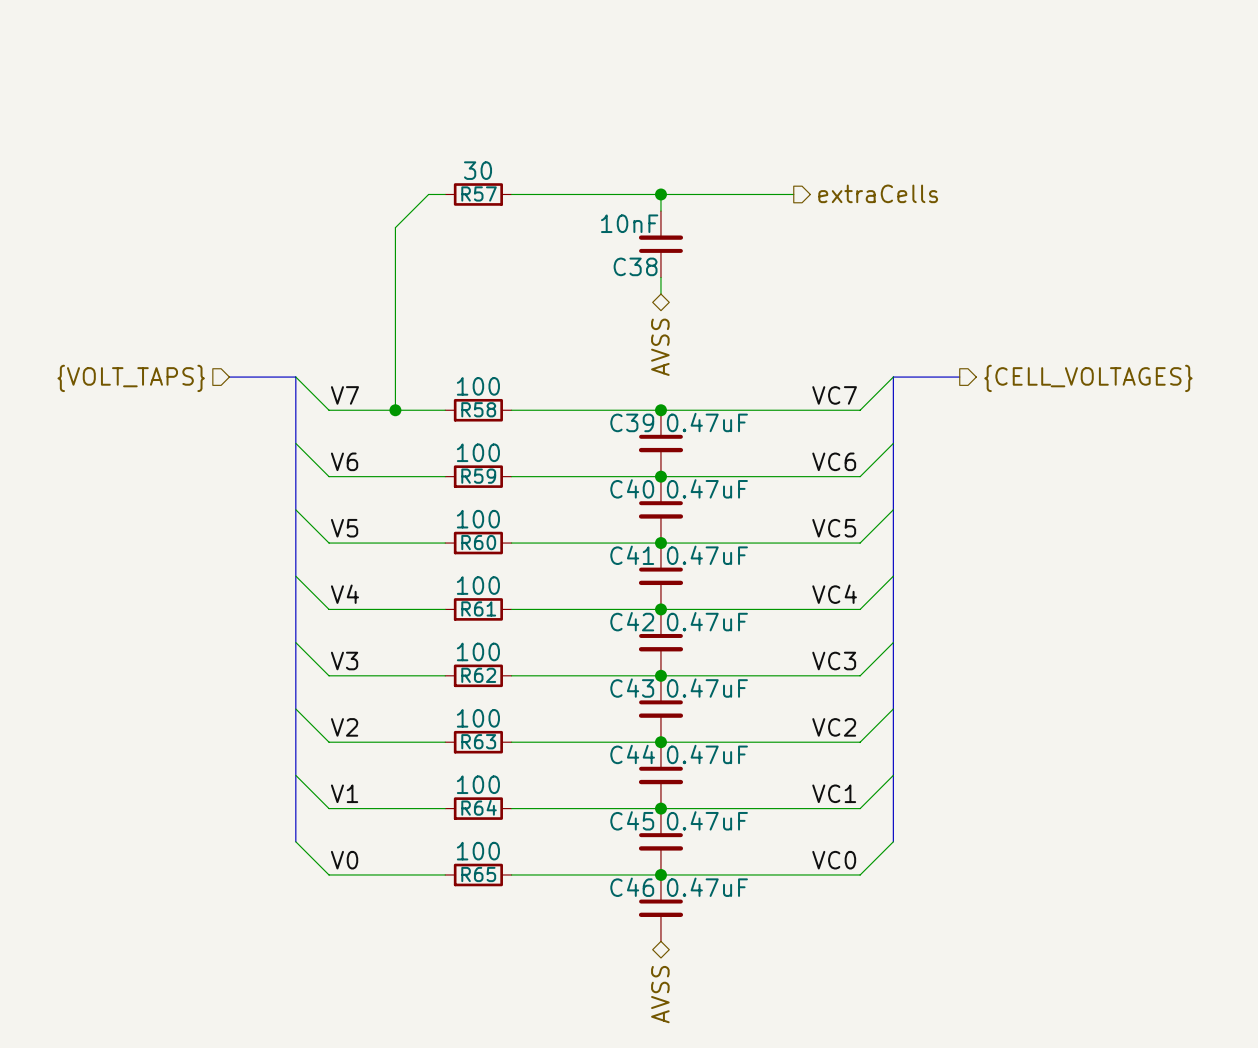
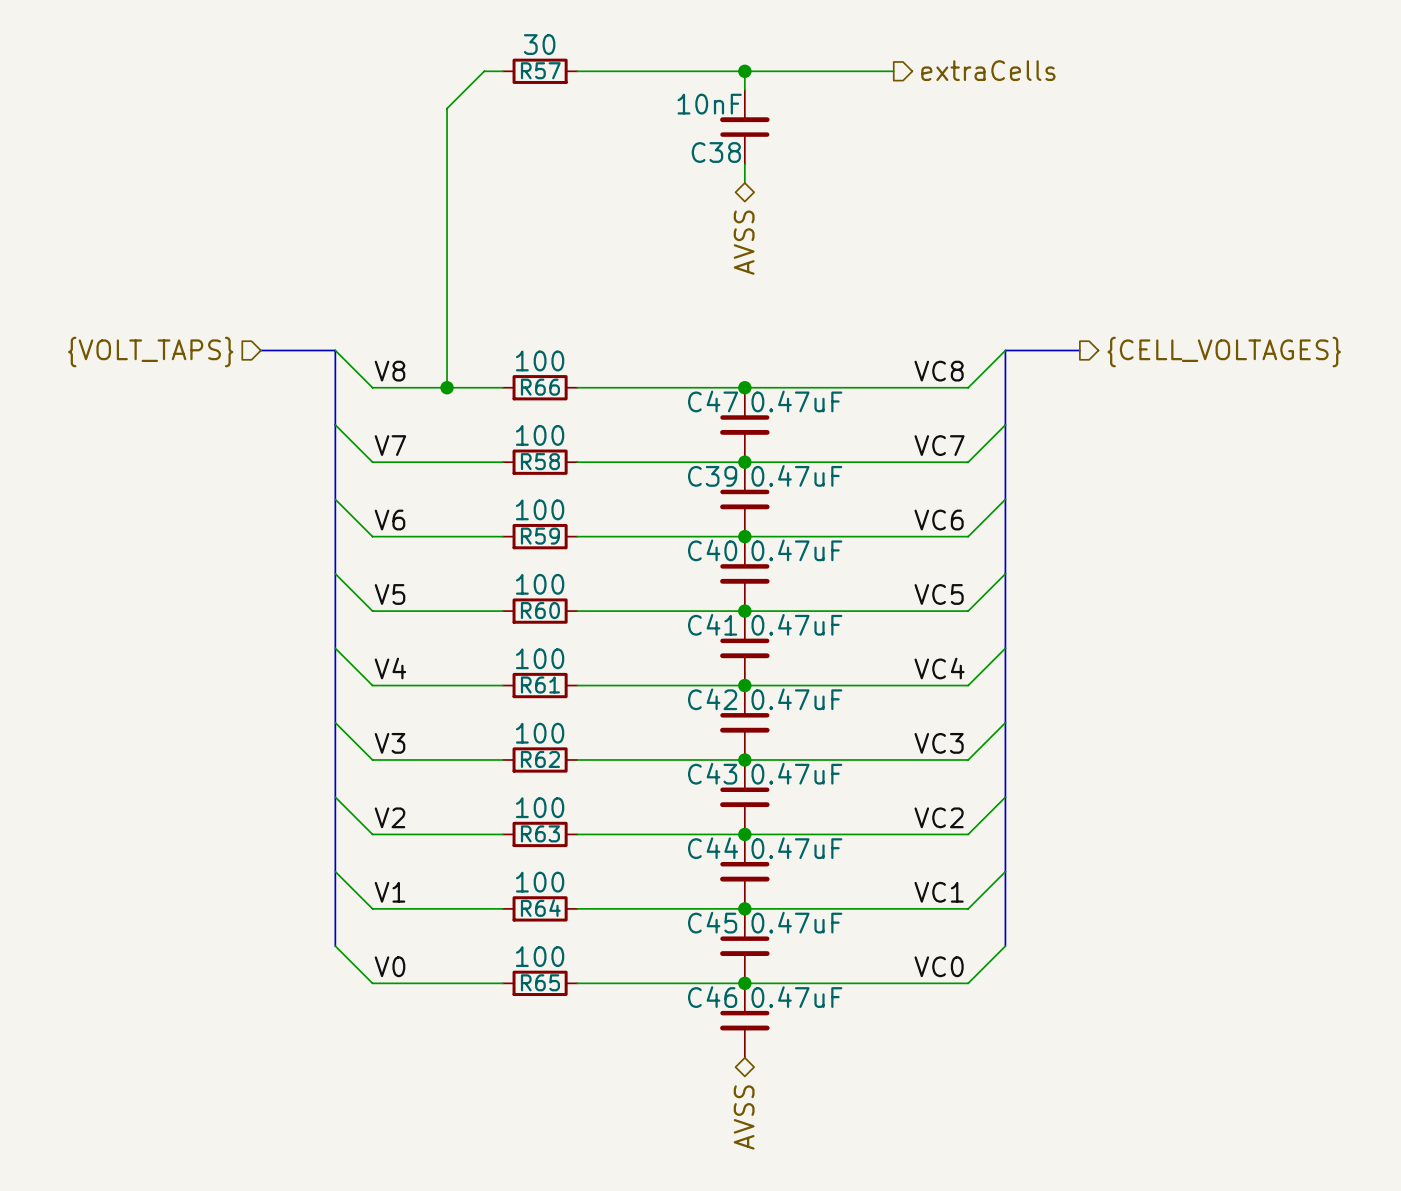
junction: none -> (744, 71)
hierarchical label position: extraCells (878, 193) -> extraCells (988, 70)
wire: (445, 194) (428, 194) (395, 227) -> (502, 71) (484, 71) (447, 108) (447, 257)
R57 position: (478, 194) -> (540, 71)
wire: (511, 194) (793, 194) -> (577, 71) (893, 71)
wire: (660, 194) (660, 211) -> (744, 71) (744, 89)
junction: (660, 194) -> none
C38 position: (660, 244) -> (744, 127)
wire: (660, 277) (660, 294) -> (744, 164) (744, 182)
wire: none -> (335, 350) (372, 387) (502, 387)
wire: none -> (1005, 350) (968, 387) (577, 387)
label: none -> V8 (390, 371)
label: none -> VC8 (939, 371)
wire: (395, 343) (395, 410) -> none
R66: none -> 100 (540, 387)
junction: none -> (744, 387)
hierarchical label position: AVSS (660, 347) -> AVSS (744, 242)
bus: (229, 377) (295, 377) -> (260, 350) (335, 350) (335, 424)
C47: none -> 0.47uF (744, 424)
bus: (893, 377) (959, 377) -> (1005, 424) (1005, 350) (1079, 350)
hierarchical label position: {VOLT_TAPS} (131, 378) -> {VOLT_TAPS} (150, 352)
hierarchical label position: {CELL_VOLTAGES} (1088, 378) -> {CELL_VOLTAGES} (1224, 352)
junction position: (395, 410) -> (447, 387)

